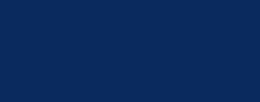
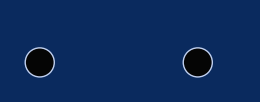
part: none -> (39, 62)
part: none -> (197, 62)

